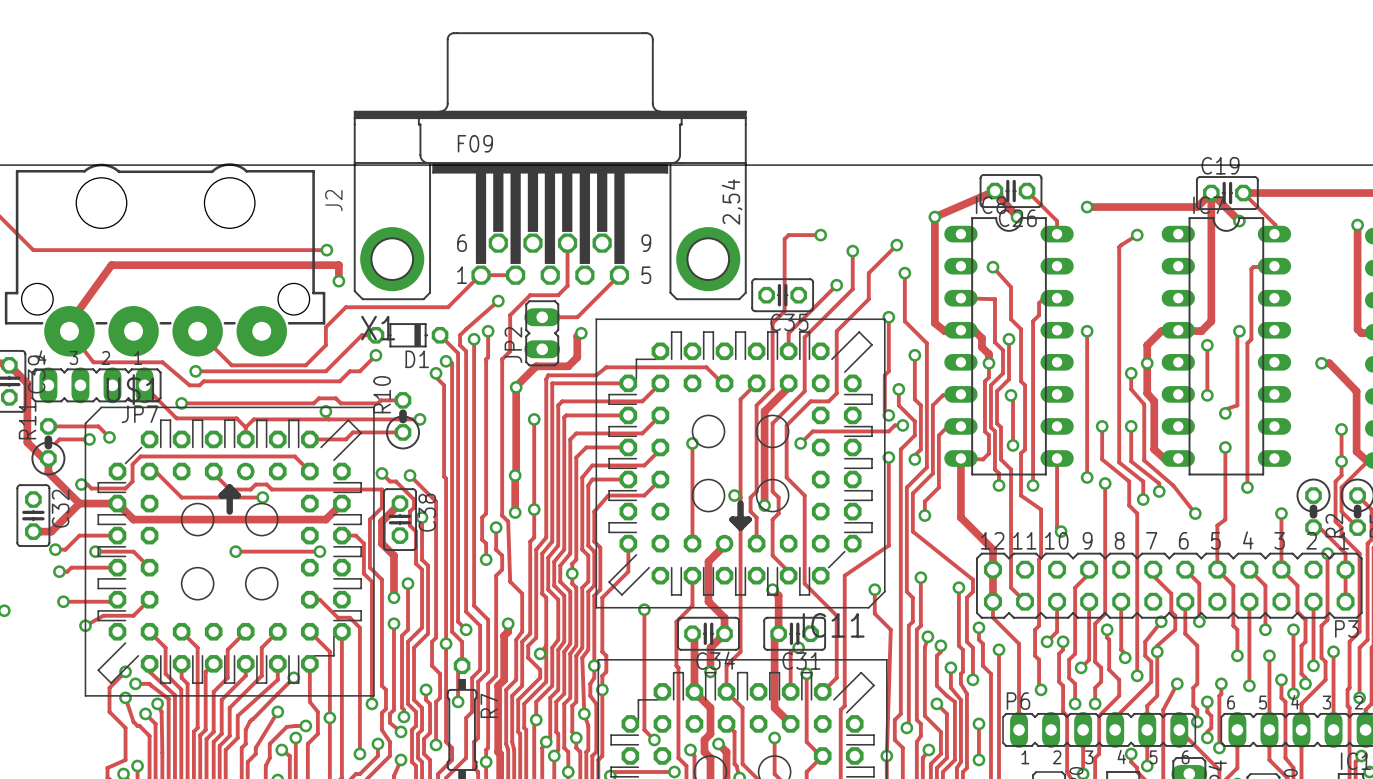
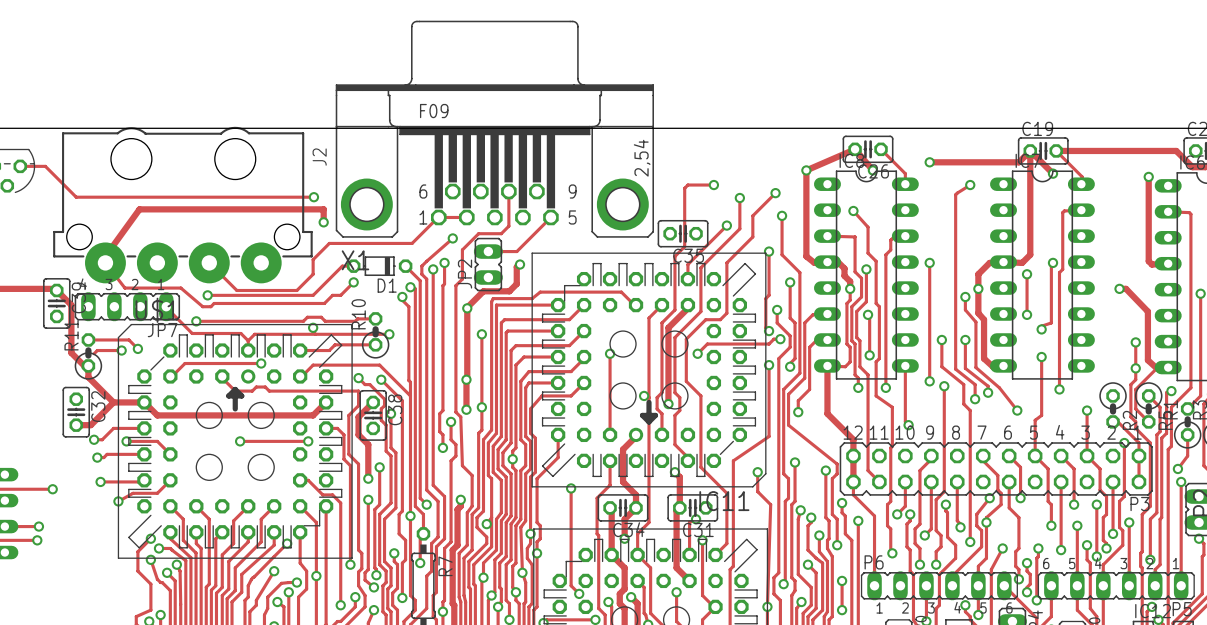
track: (151, 471) (155, 471) (181, 497) (262, 497) -> (171, 376) (184, 363) (261, 363)
track: (309, 471) (294, 456) (140, 456) (132, 464) (132, 481) (125, 488) (91, 488) (87, 484) (81, 484) -> (300, 376) (313, 365) (379, 365) (410, 395)
via: (81, 484) -> none
via position: (262, 497) -> (261, 363)

